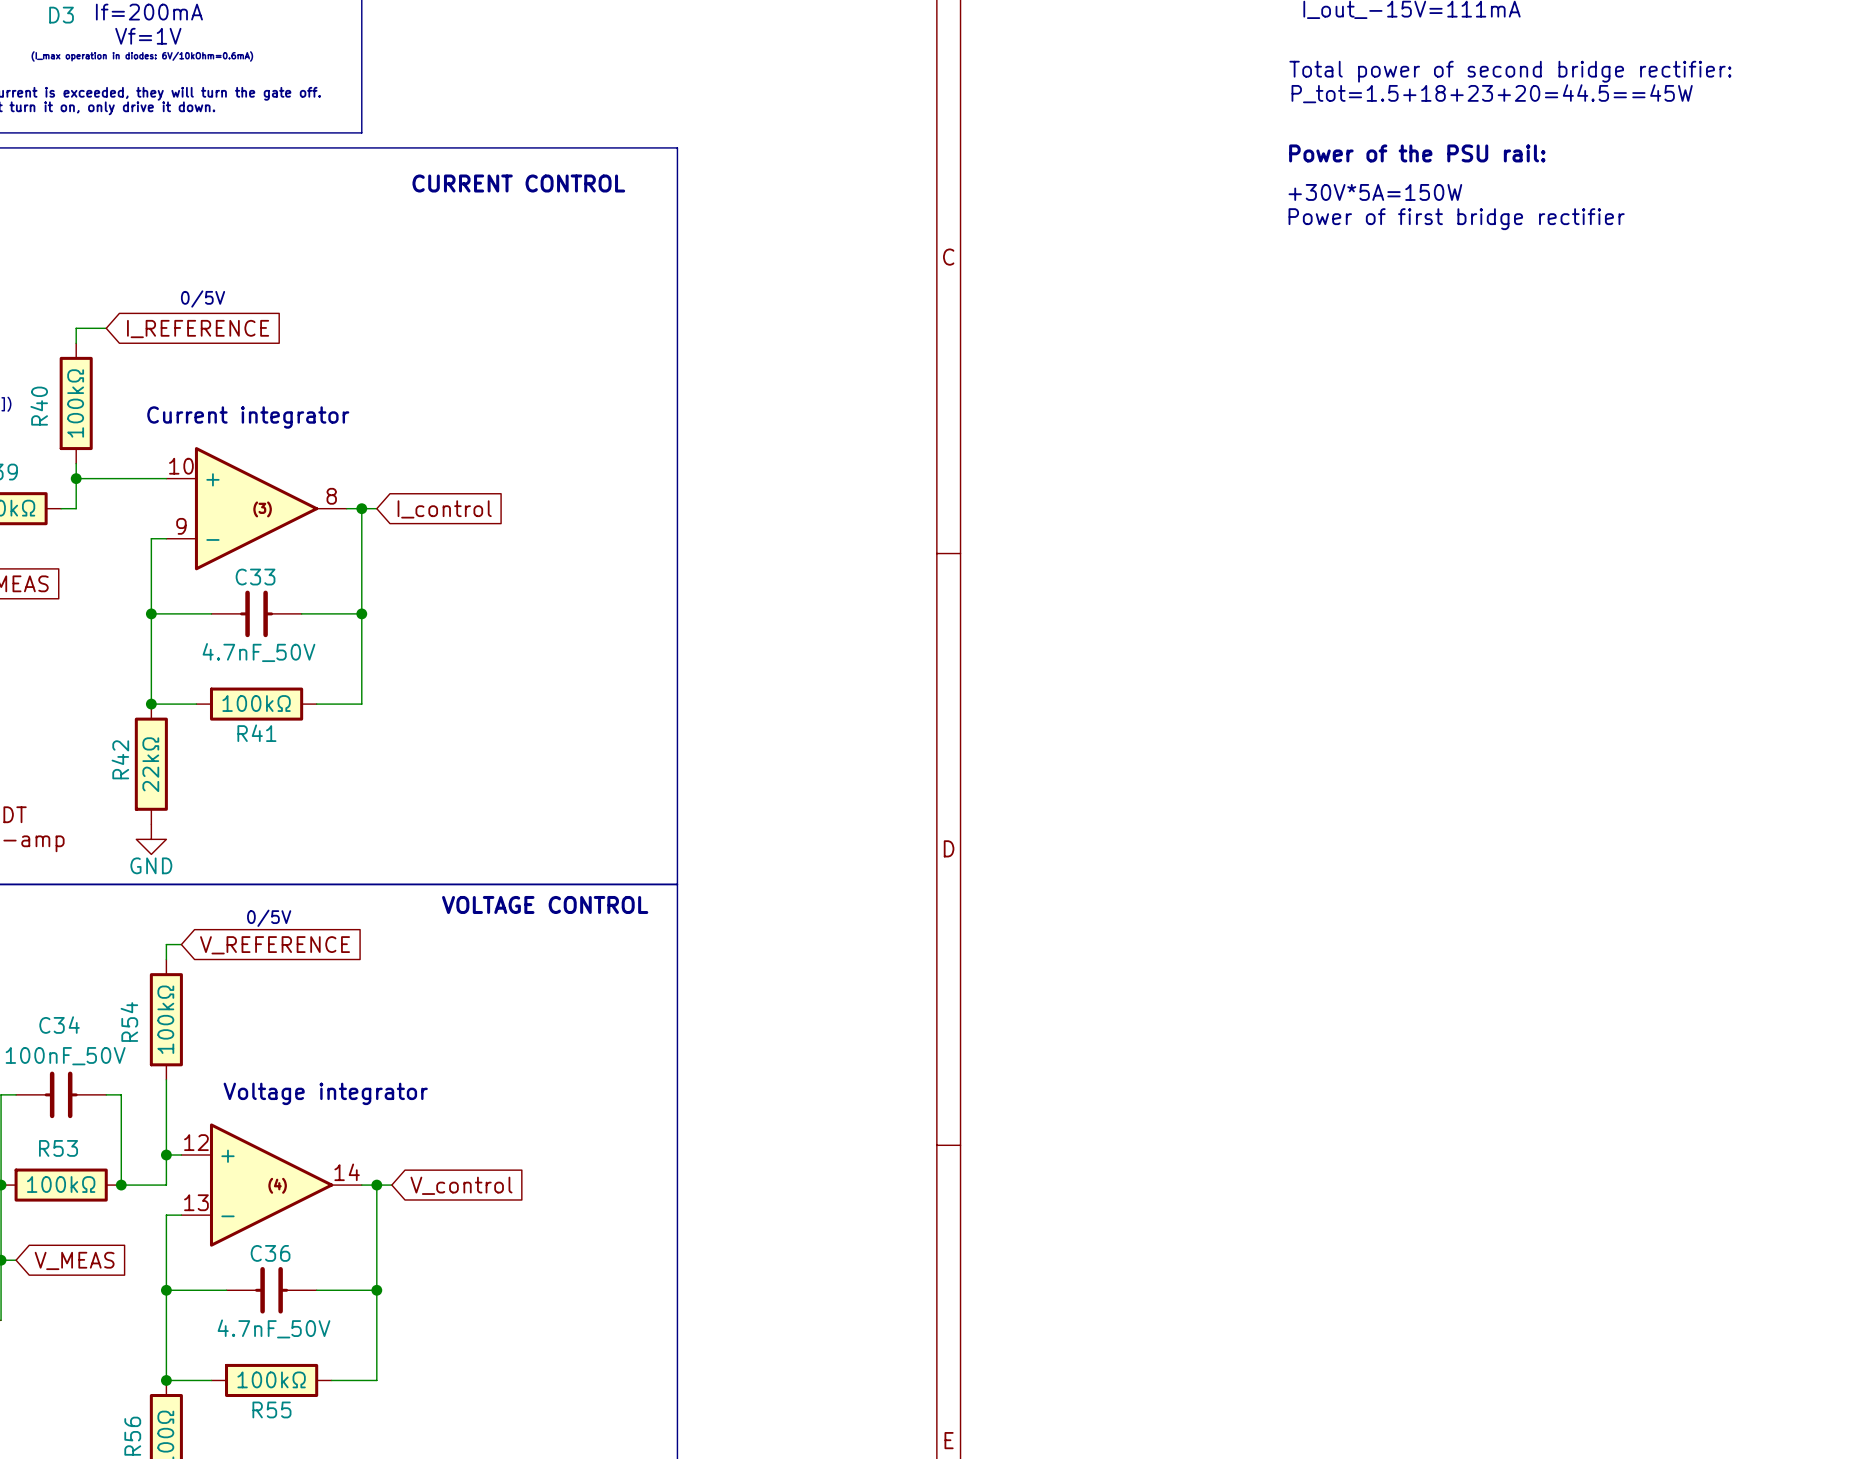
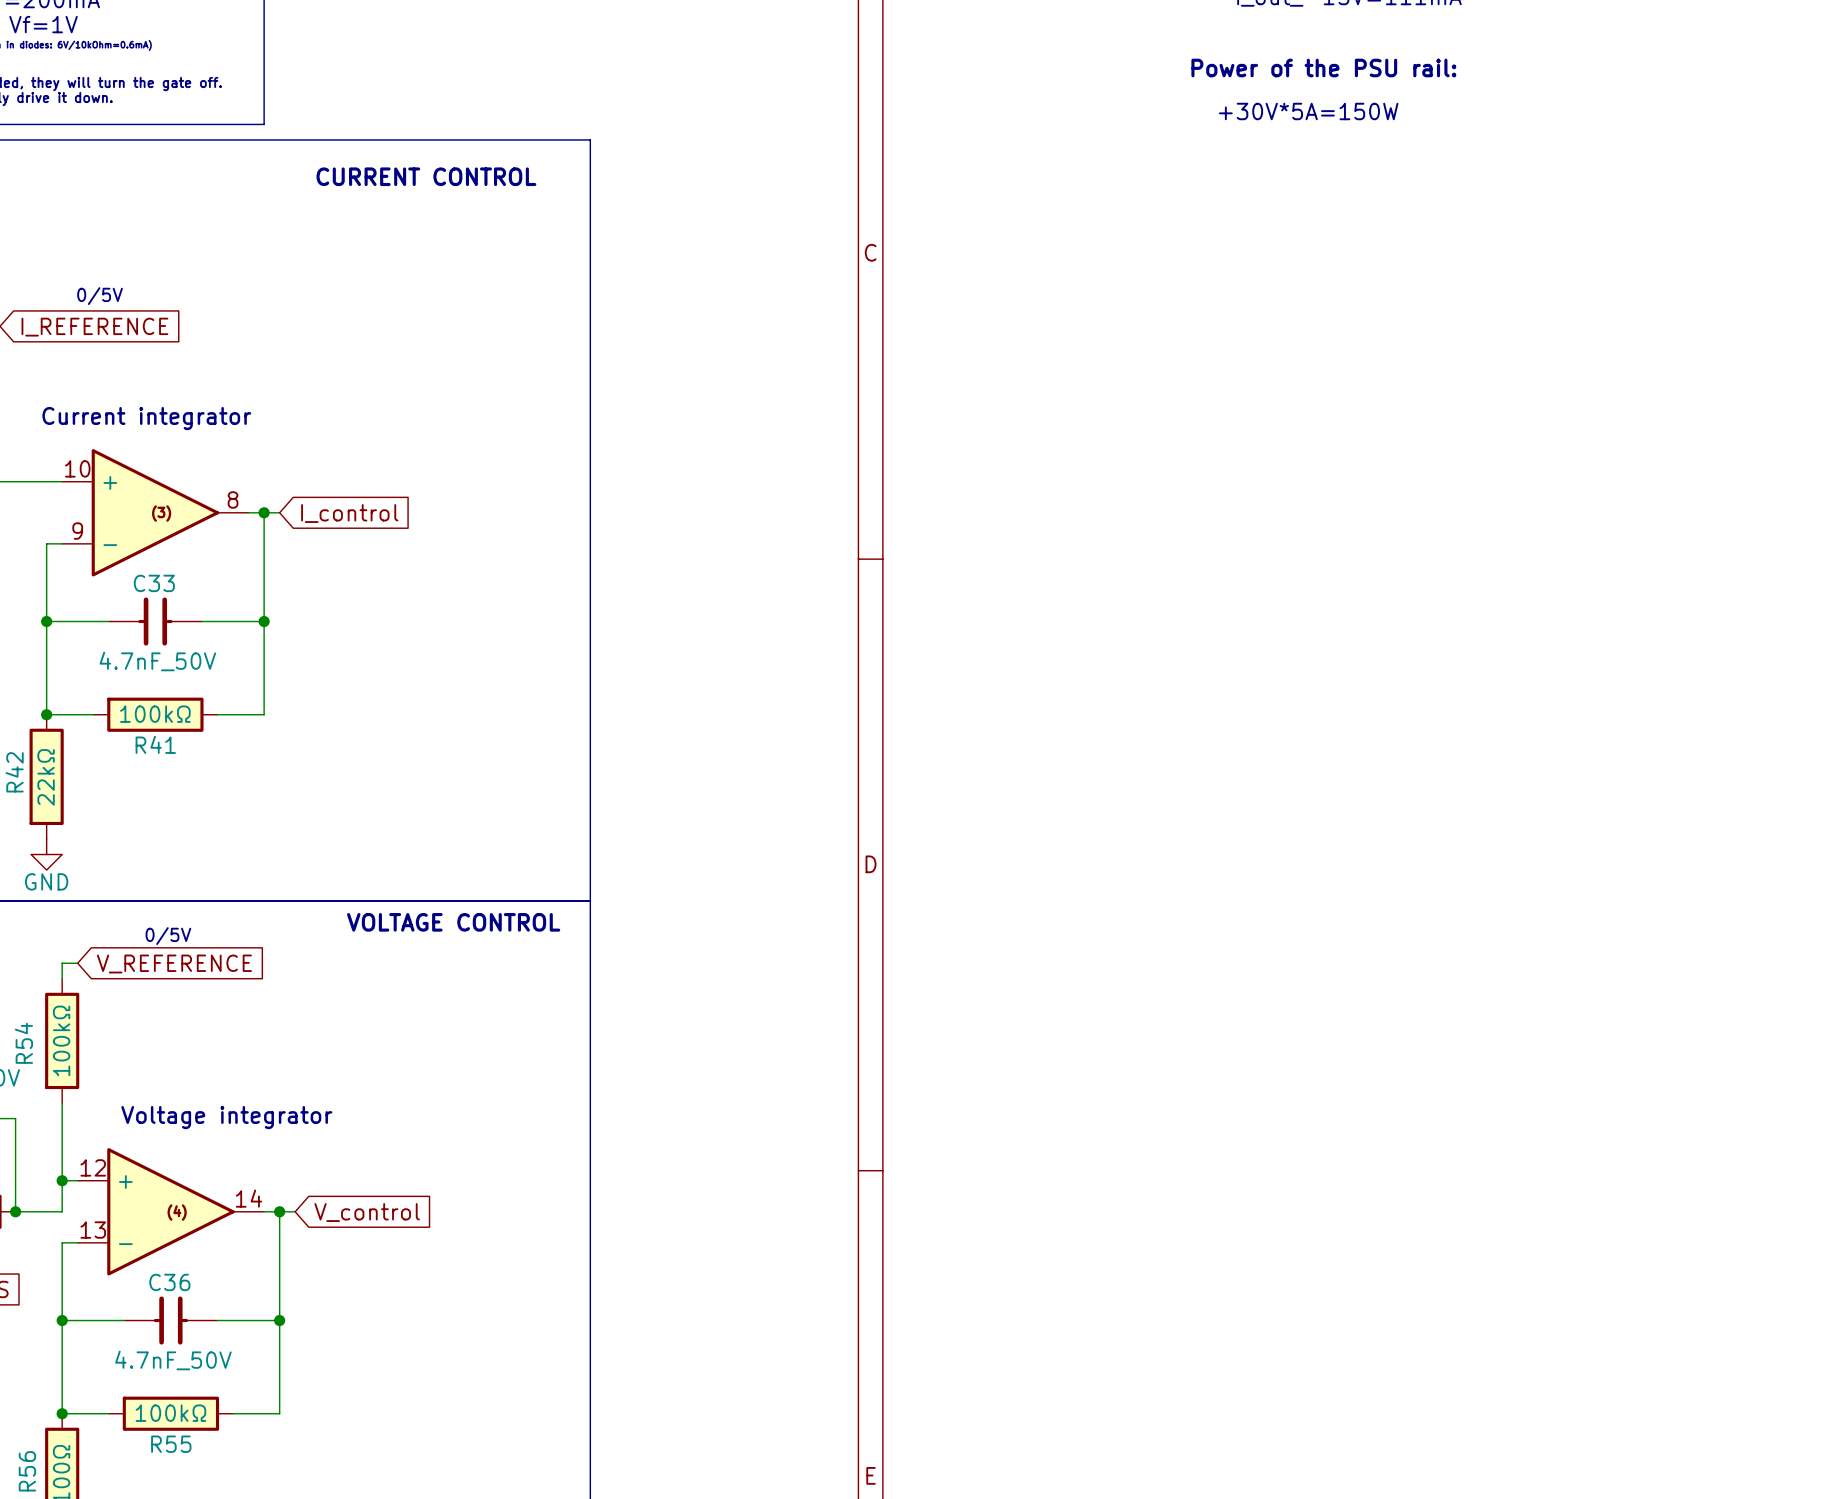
text: Total power of second bridge rectifier: (1510, 71) -> none
text: P_tot=1.5+18+23+20=44.5==45W (1492, 93) -> none
text position: Power of the PSU rail: (1417, 153) -> Power of the PSU rail: (1323, 67)
text position: +30V*5A=150W (1375, 192) -> +30V*5A=150W (1308, 111)
text: Power of first bridge rectifier (1456, 219) -> none

